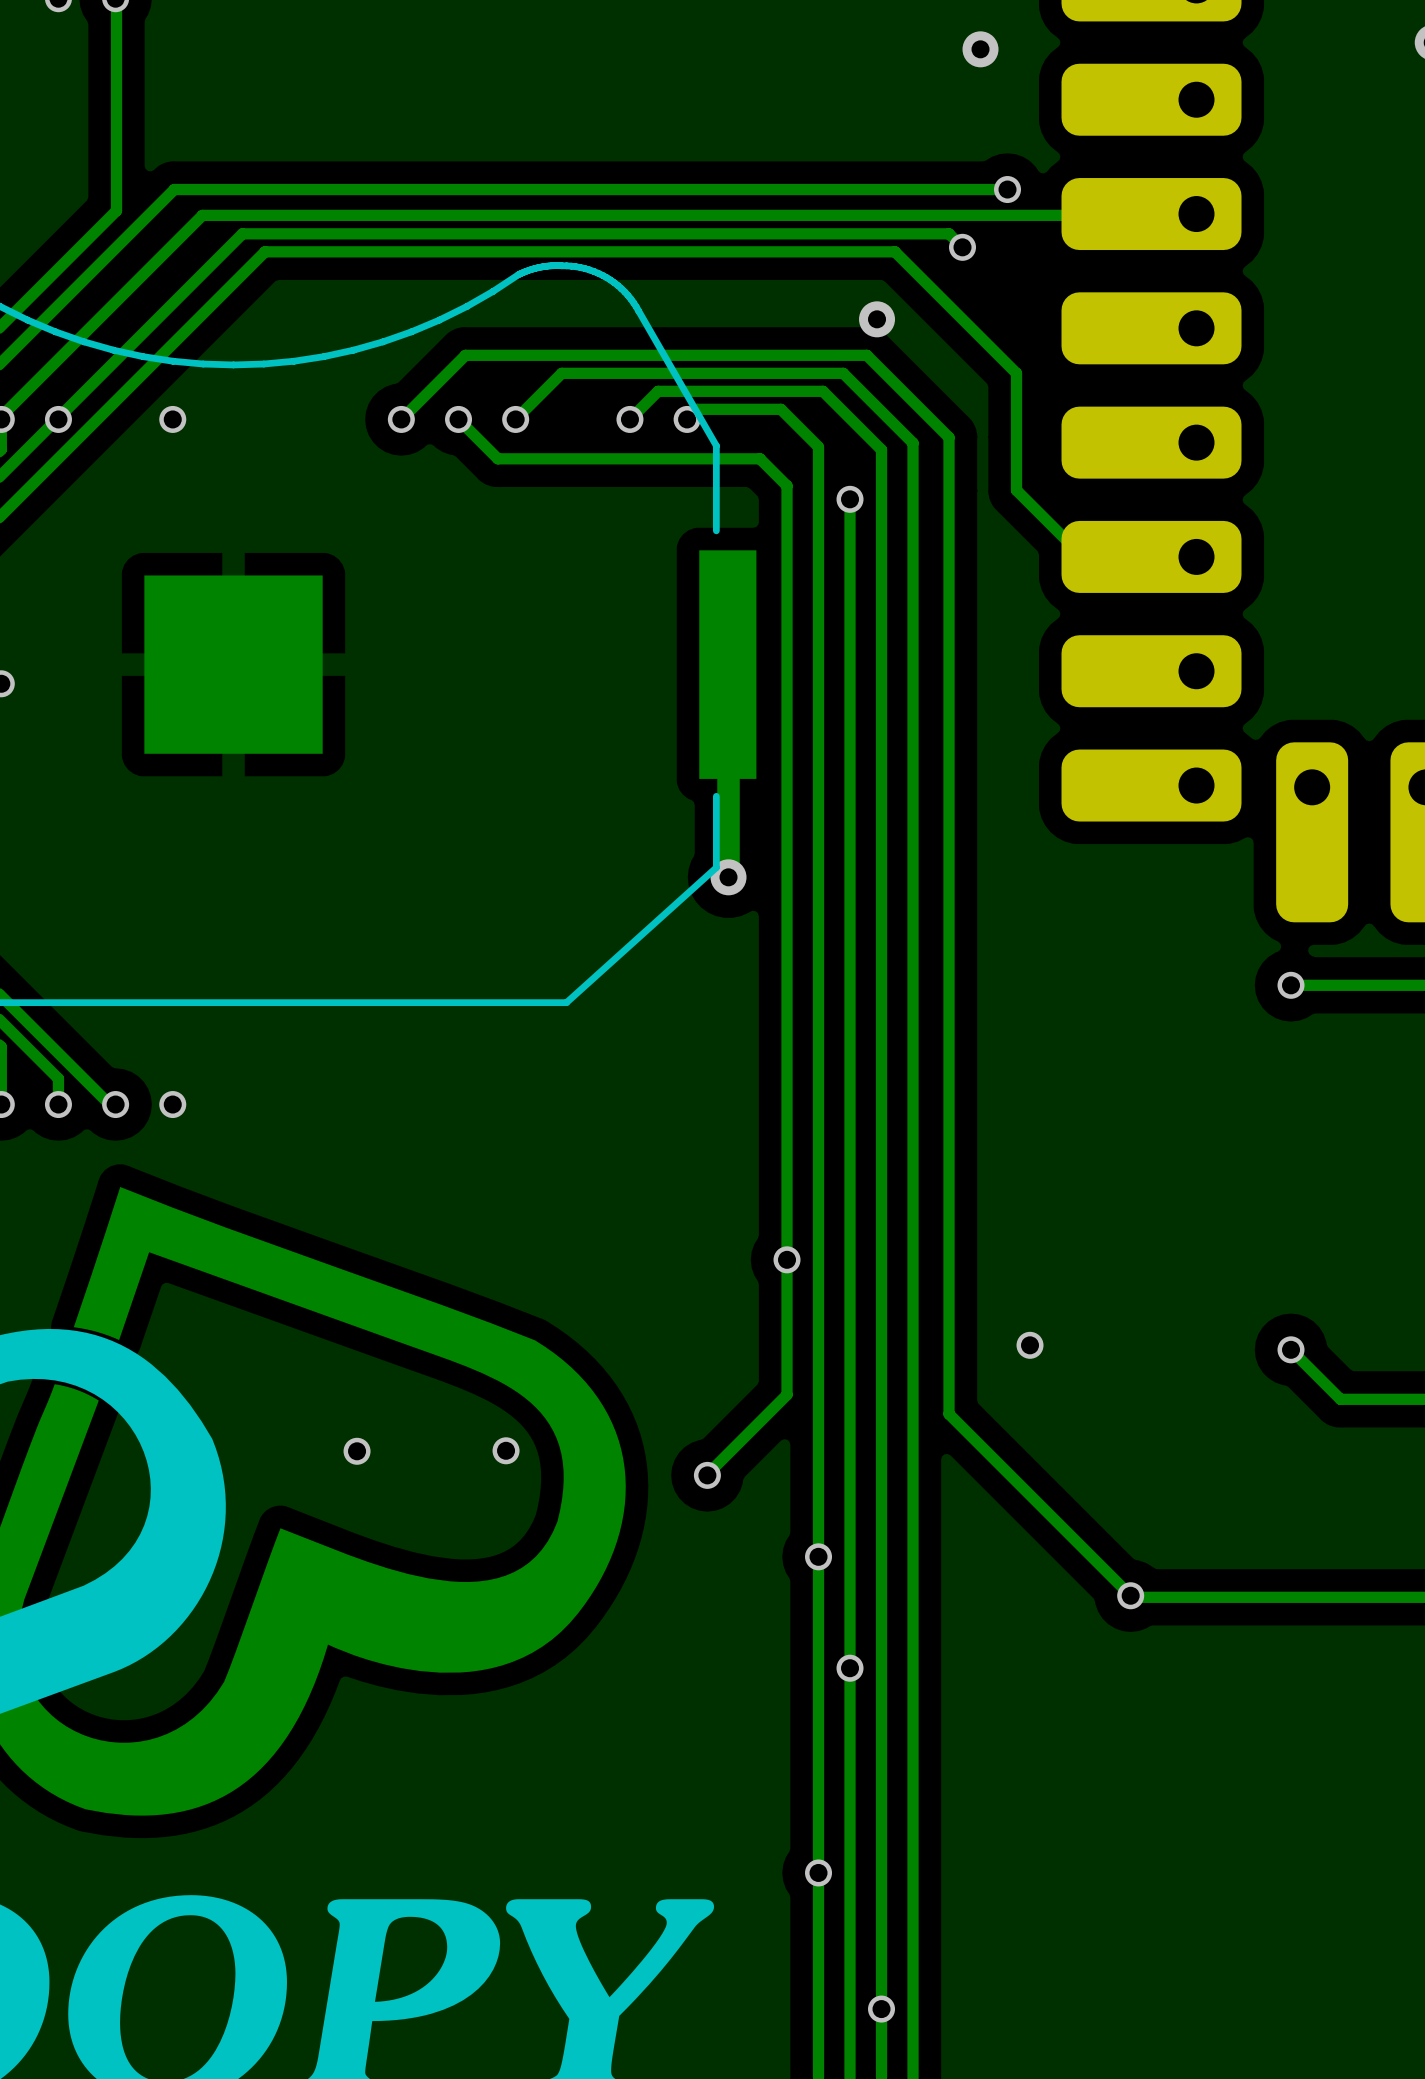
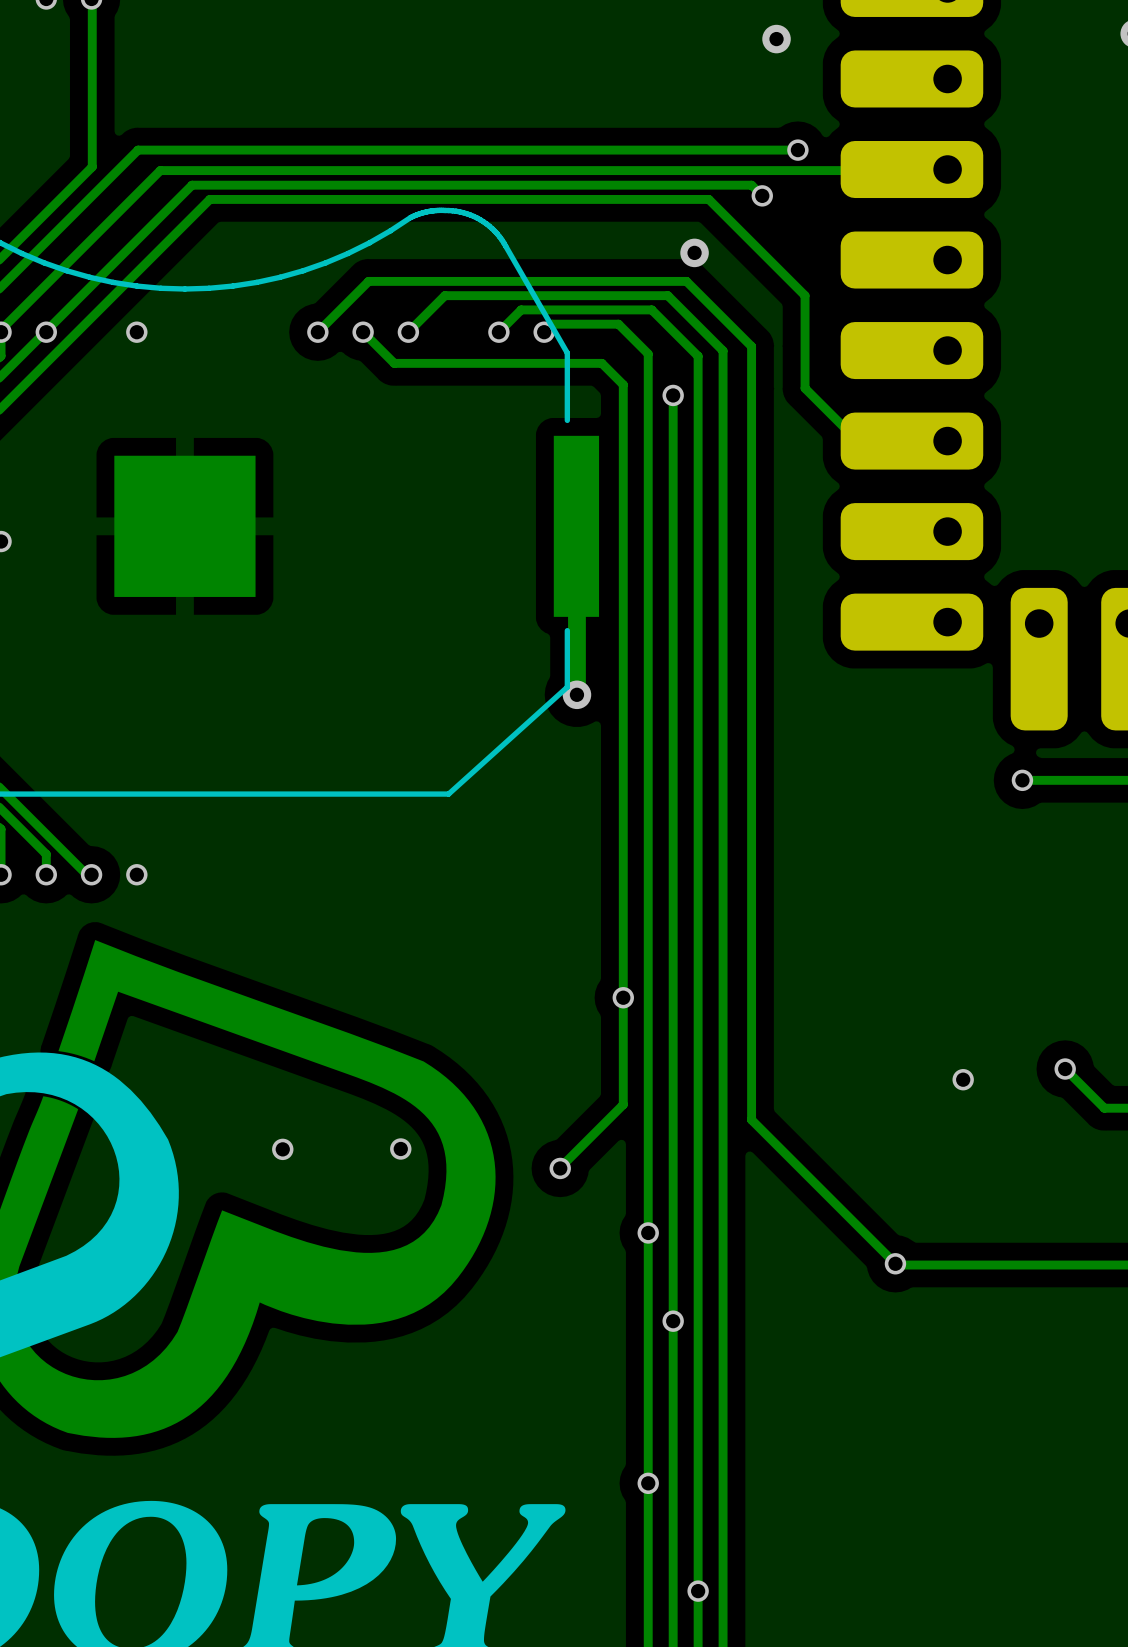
via: (1030, 1345) -> none
track: (1291, 1349) (1340, 1399) (1394, 1399) -> (1065, 1069) (1104, 1108)
via: (1291, 1349) -> none
via: none -> (1065, 1069)
via: none -> (963, 1079)

